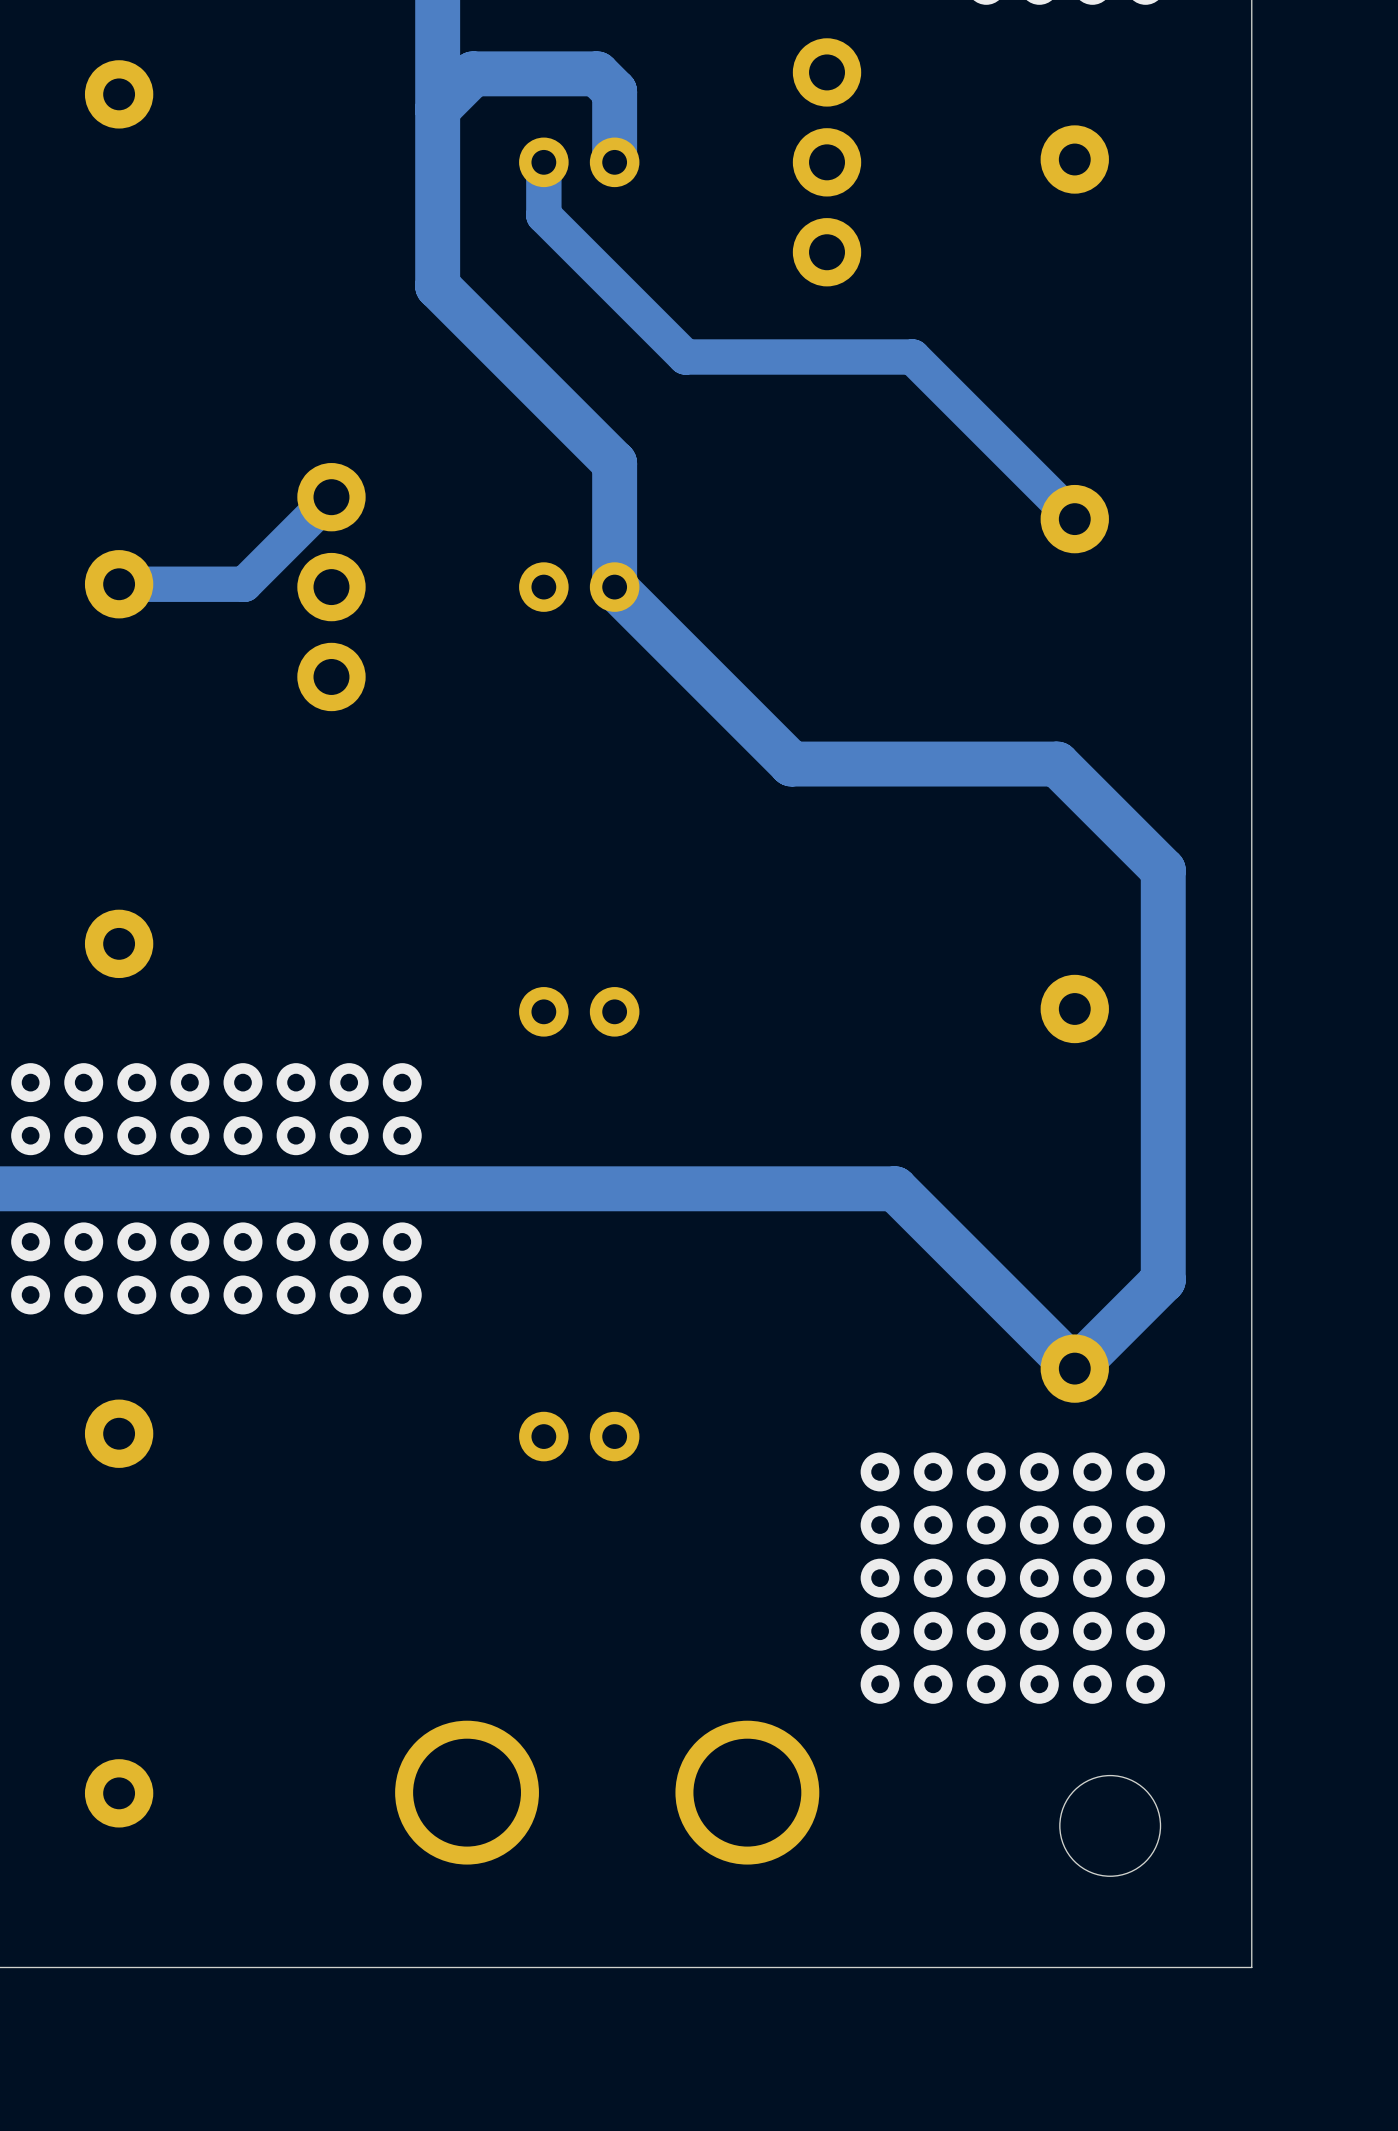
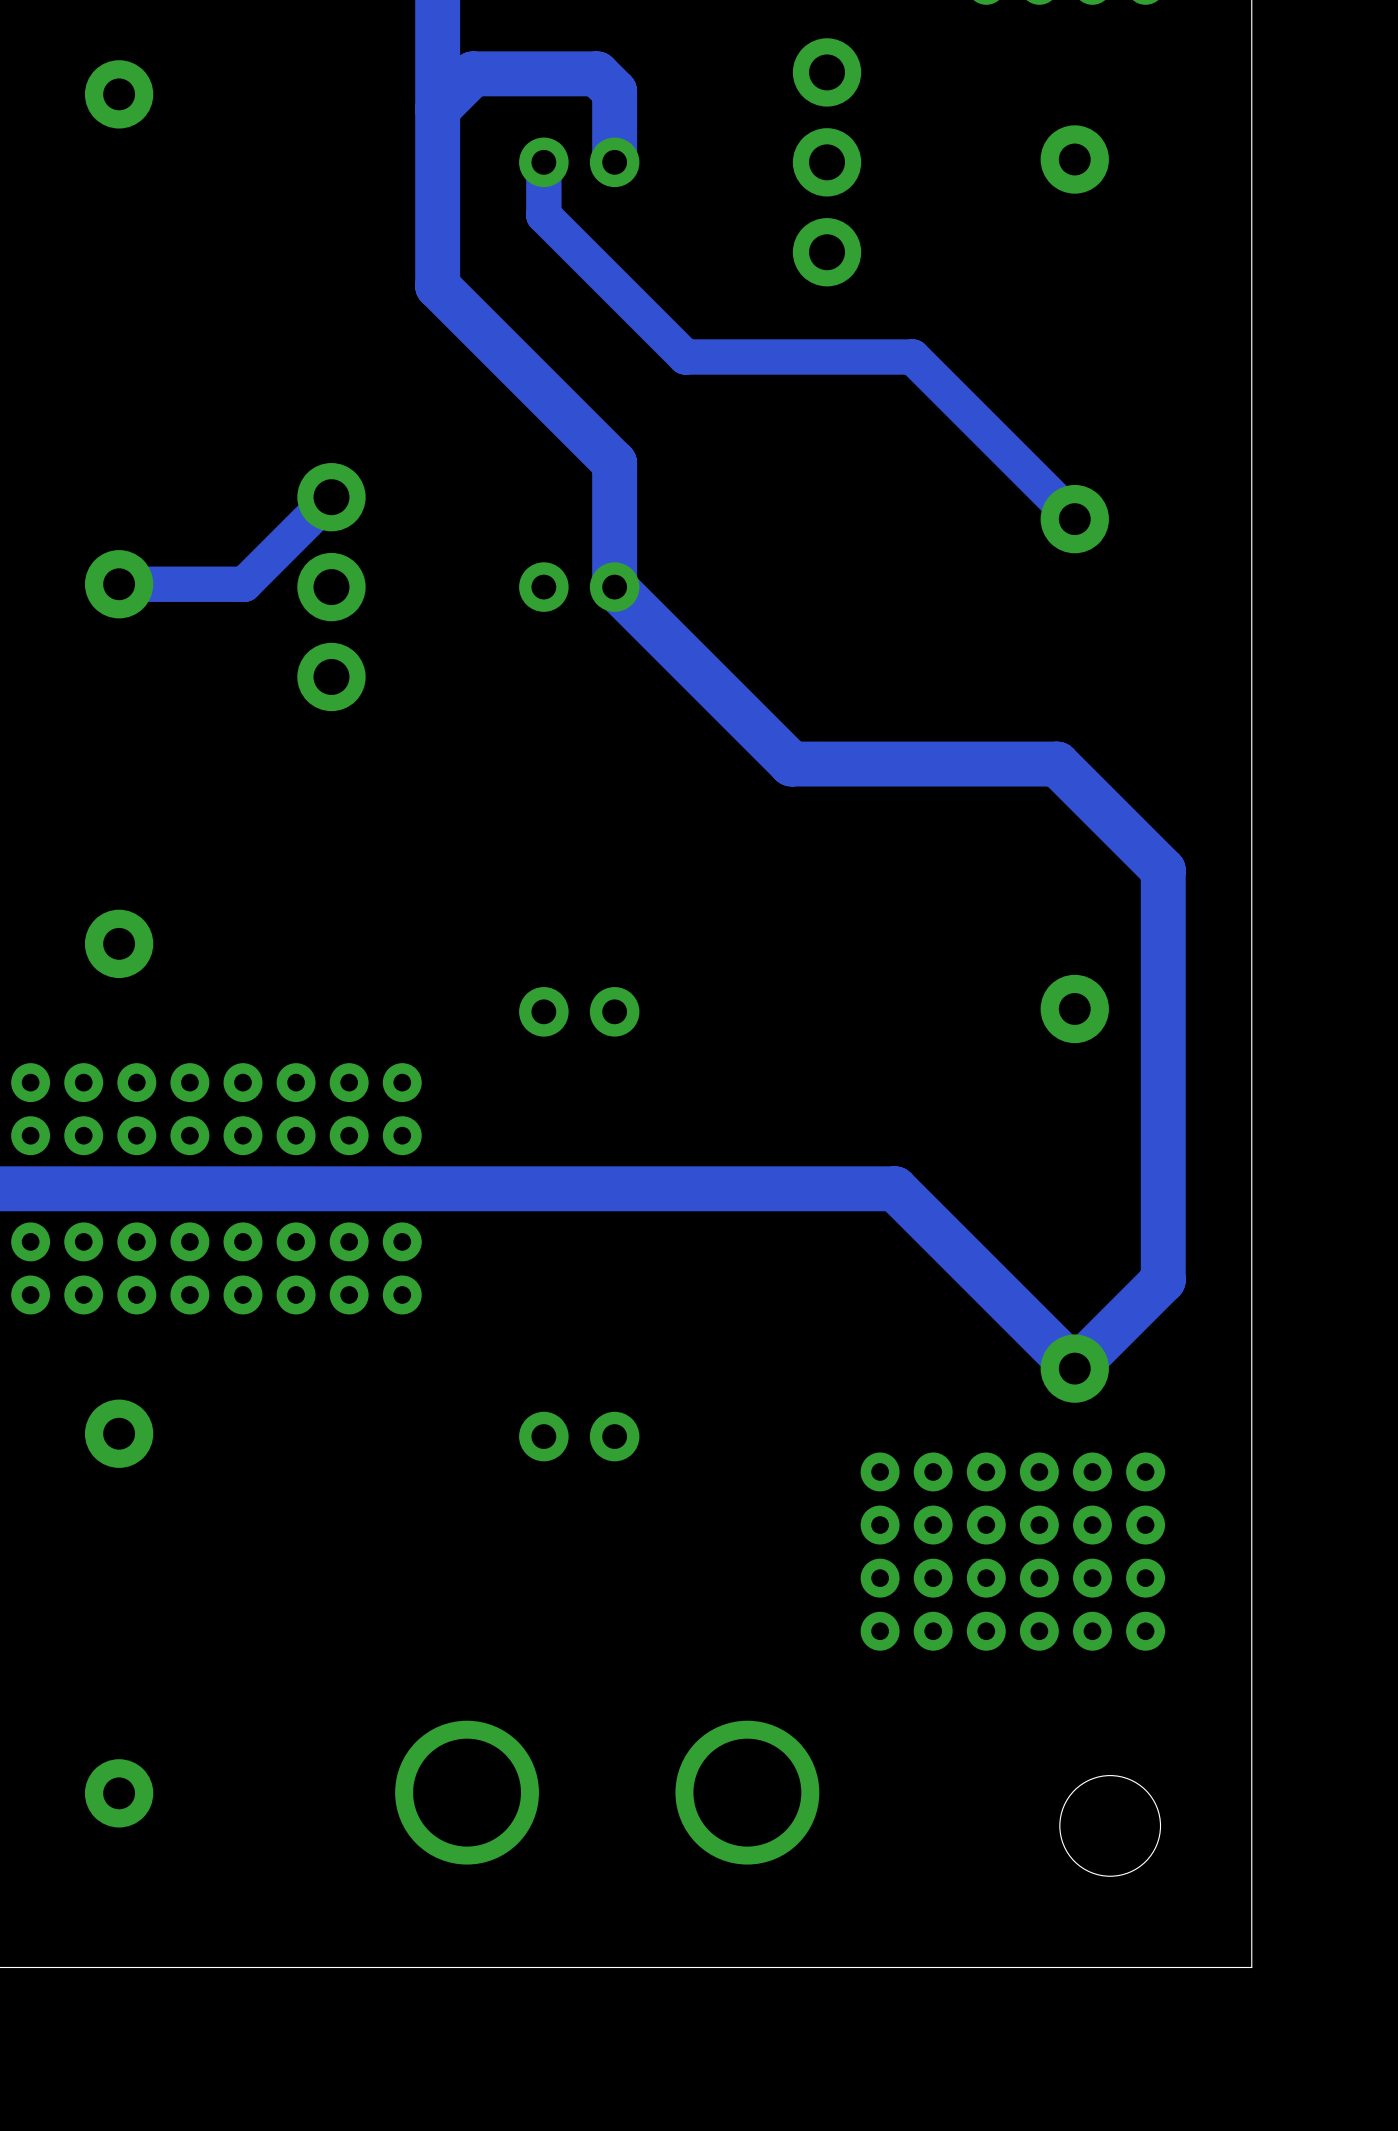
via: (880, 1684) -> none
via: (933, 1684) -> none
via: (986, 1684) -> none
via: (1039, 1684) -> none
via: (1092, 1684) -> none
via: (1145, 1684) -> none

